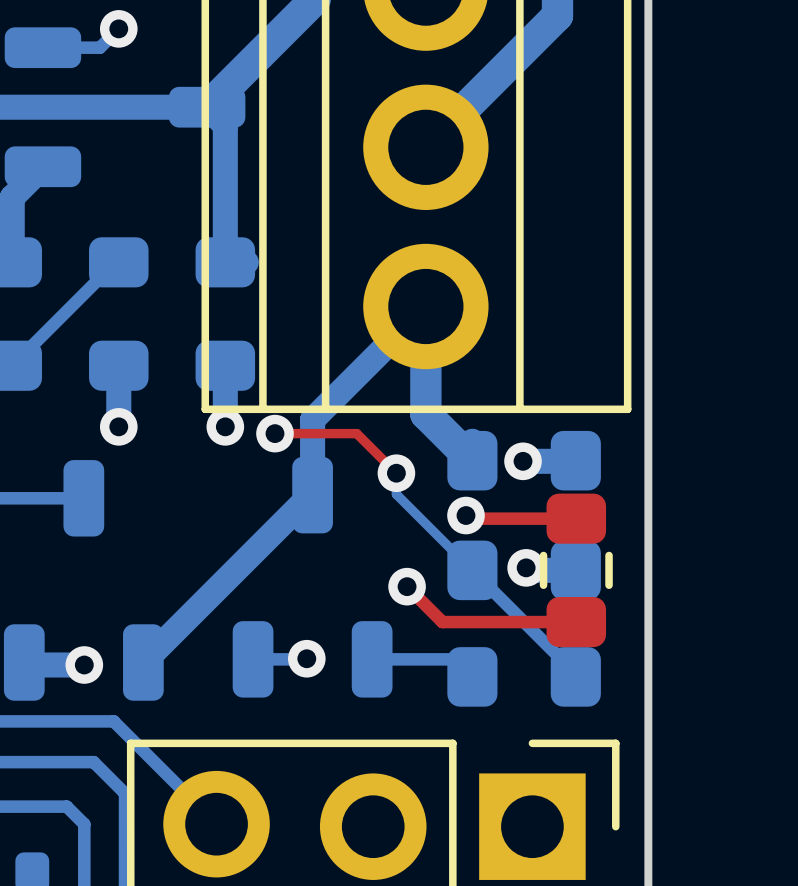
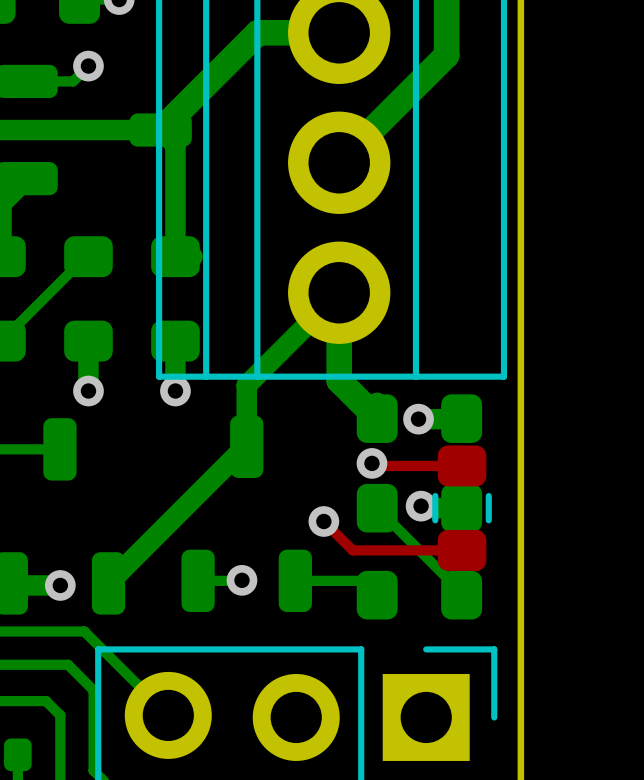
top track: (274, 433) (356, 433) (396, 473) -> none
via: (274, 433) -> none
bottom track: (396, 473) (396, 494) (472, 570) -> none
via: (396, 473) -> none

